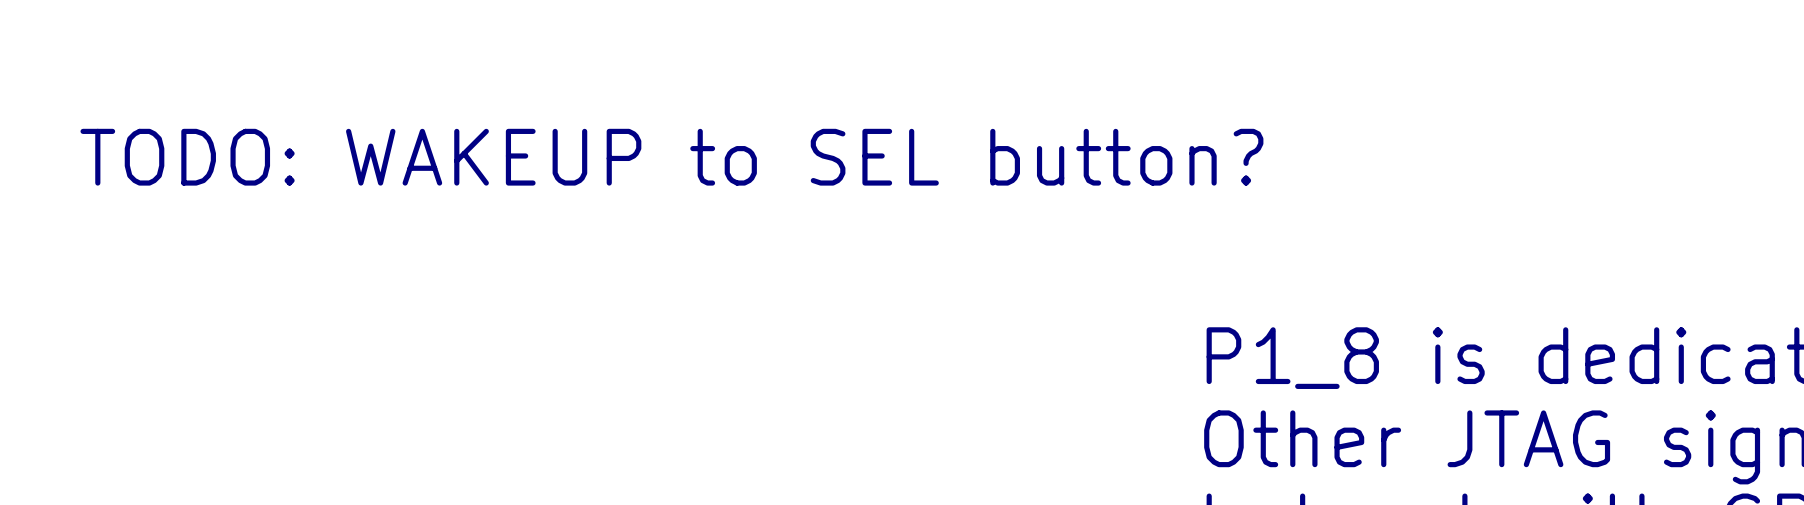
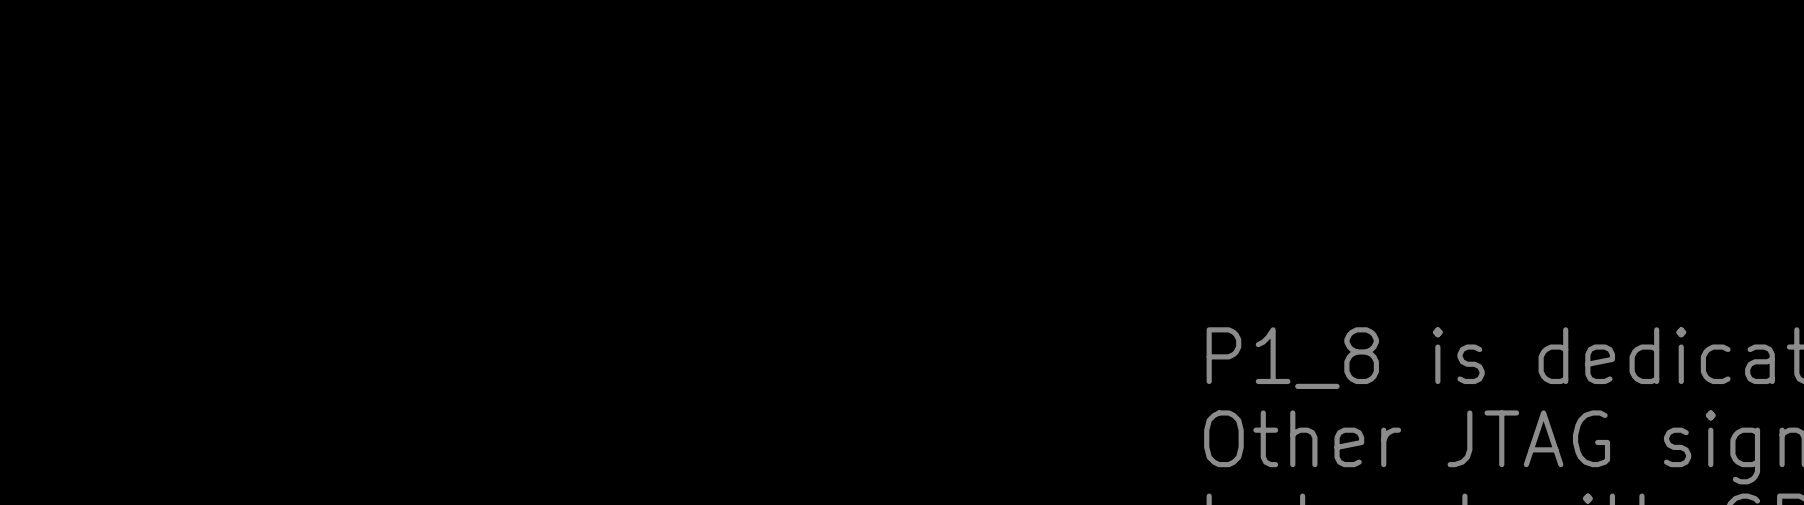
text: TODO: WAKEUP to SEL button? (671, 157) -> none

